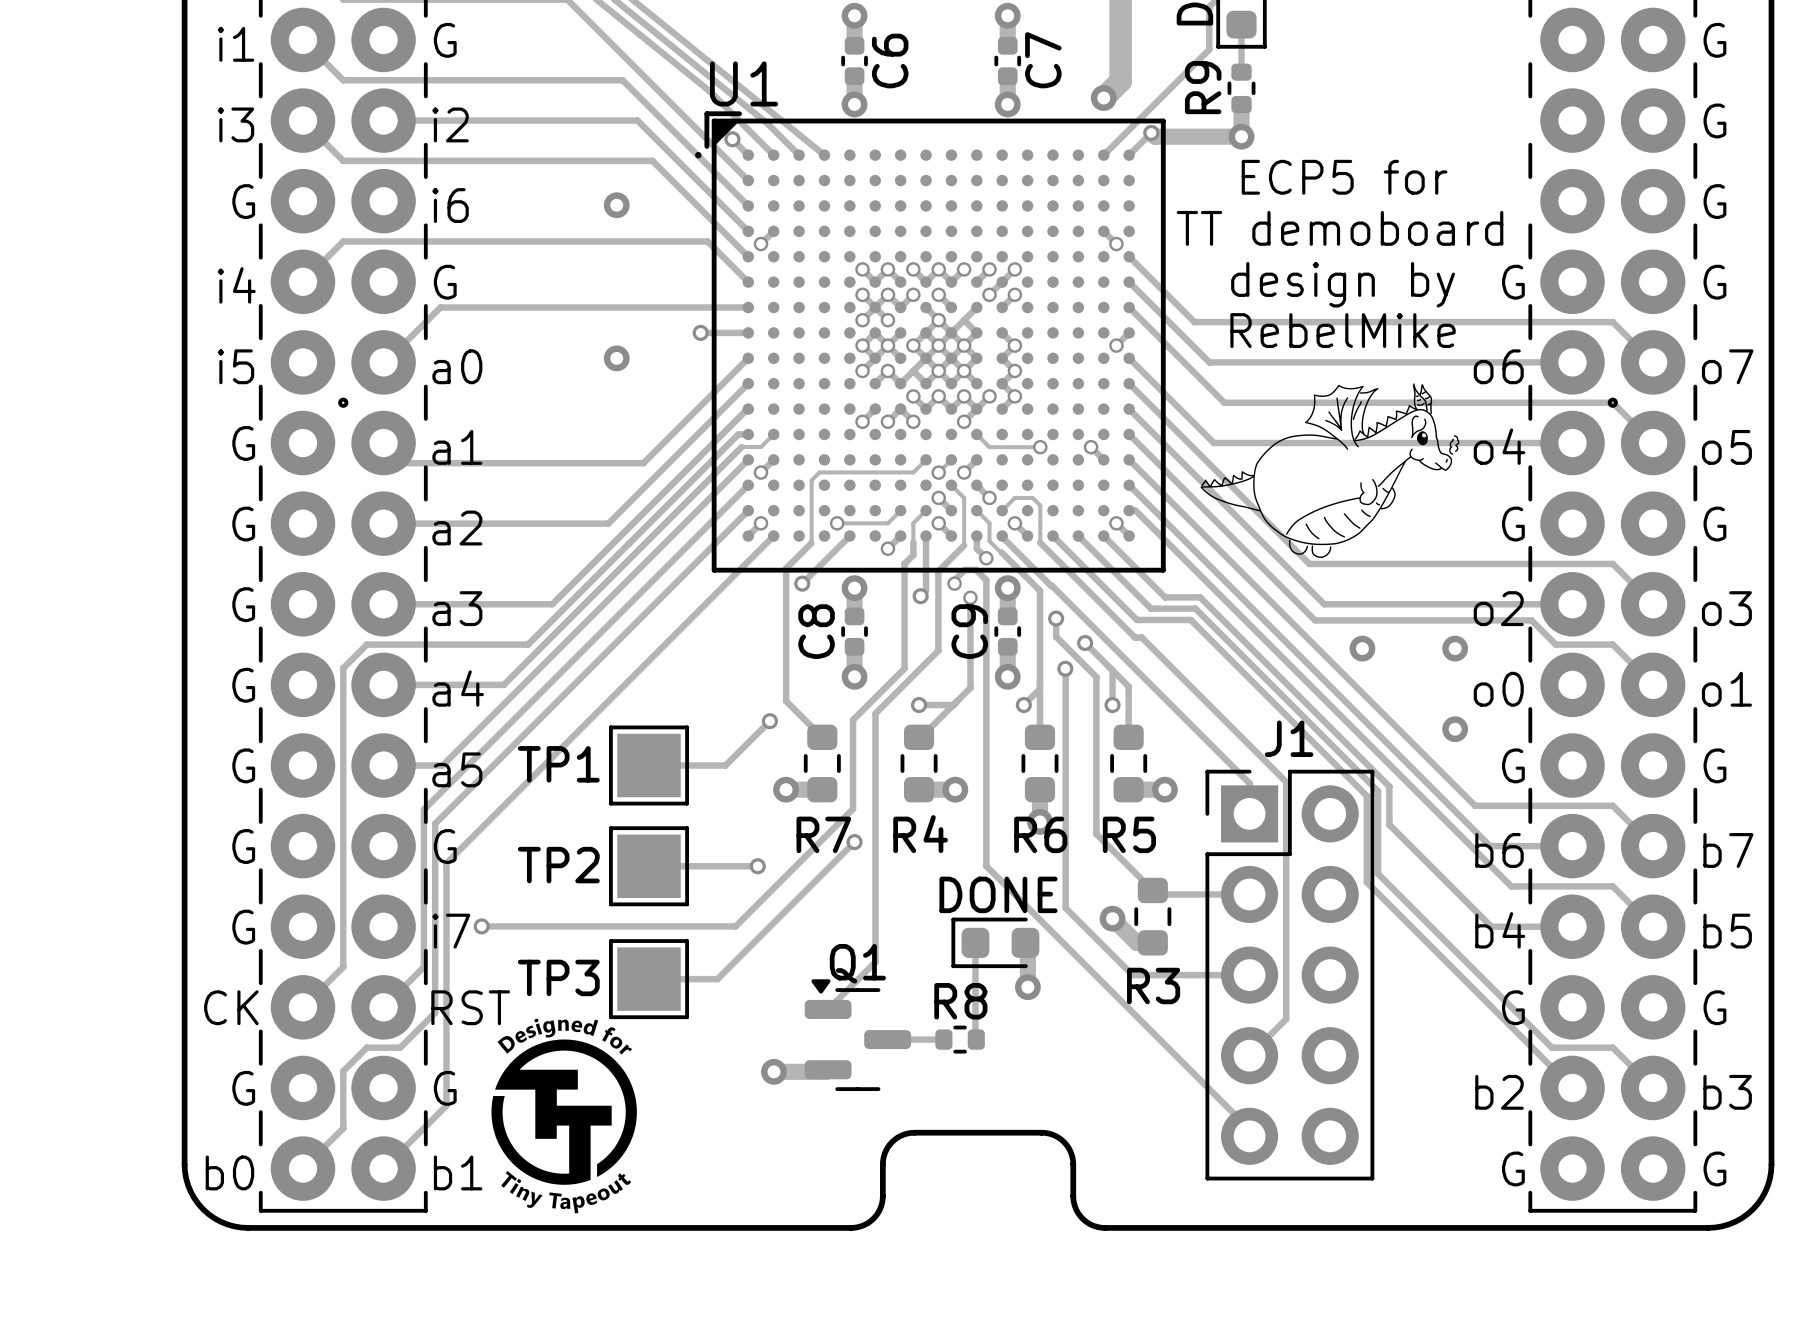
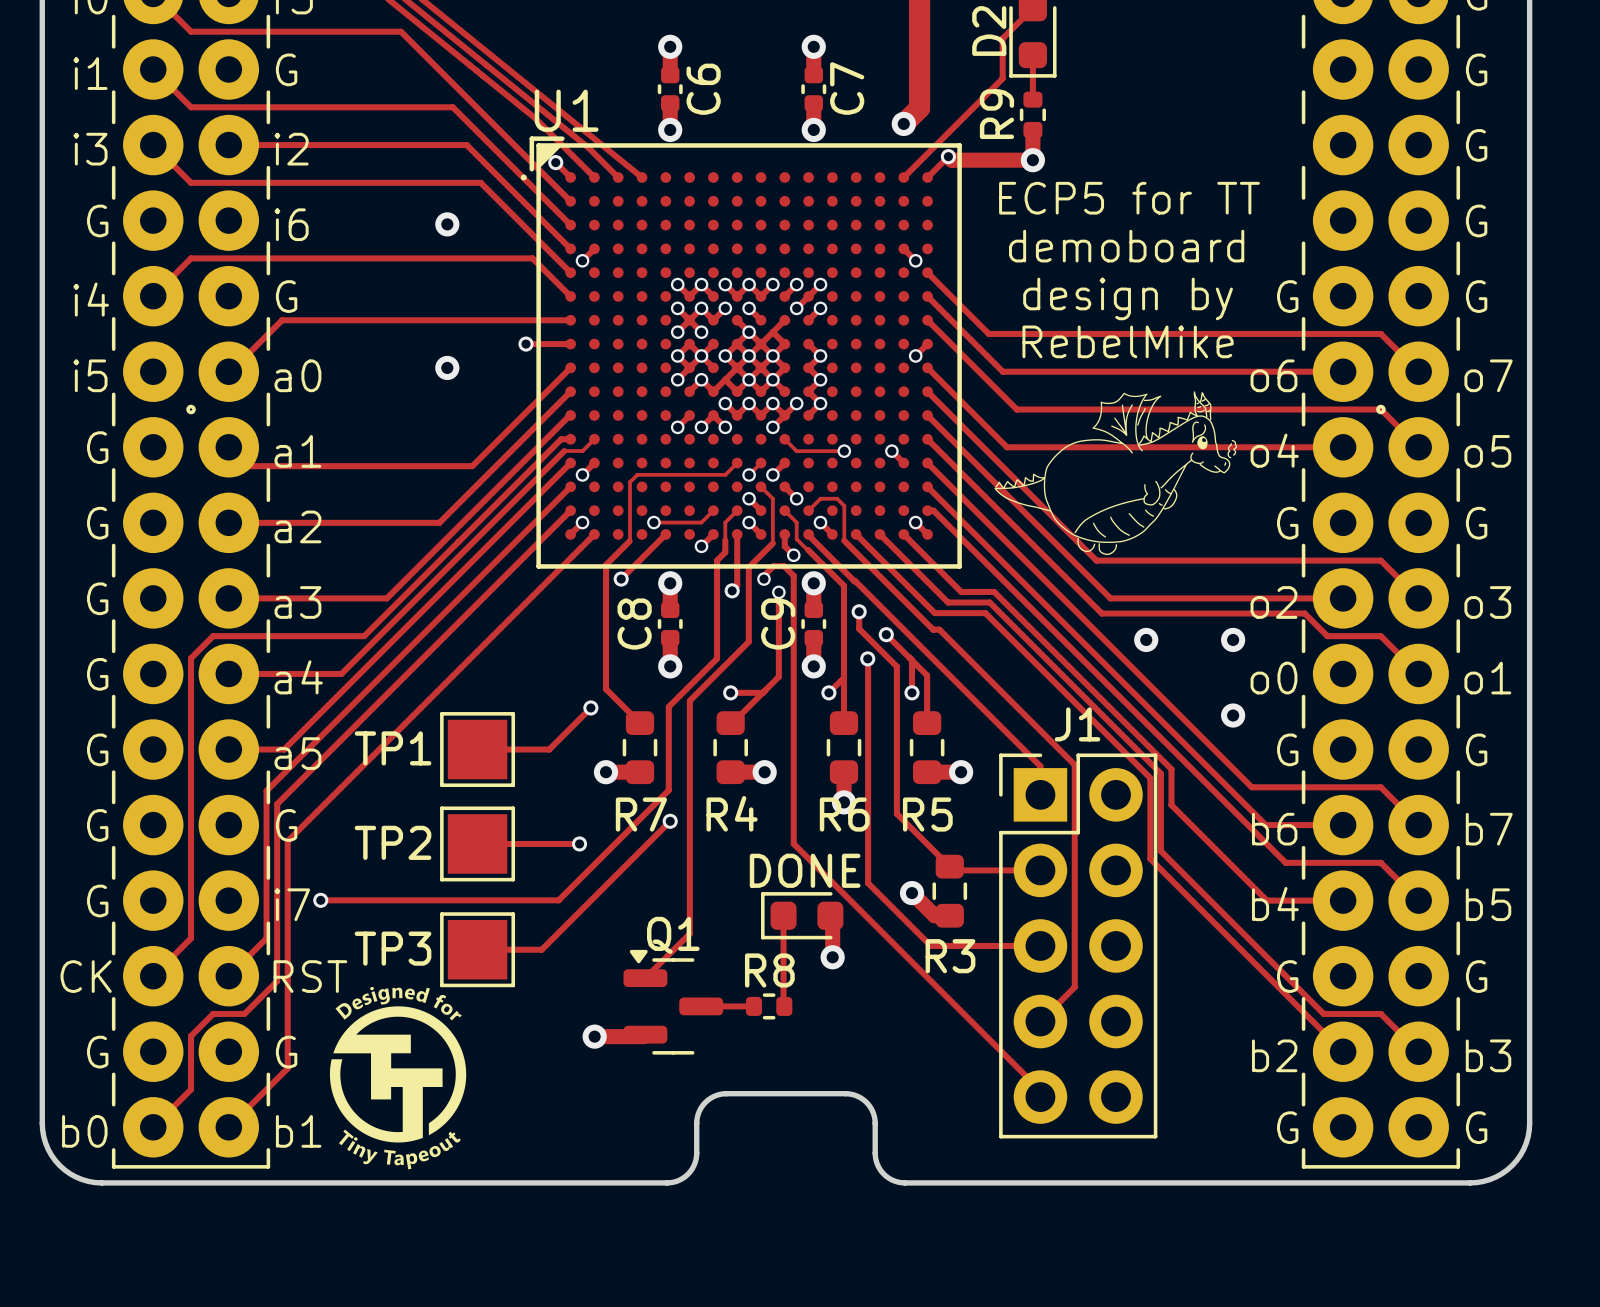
text: ECP5 for (1344, 177) -> ECP5 for TT (1129, 198)
text: TT demoboard (1340, 228) -> demoboard (1126, 246)

